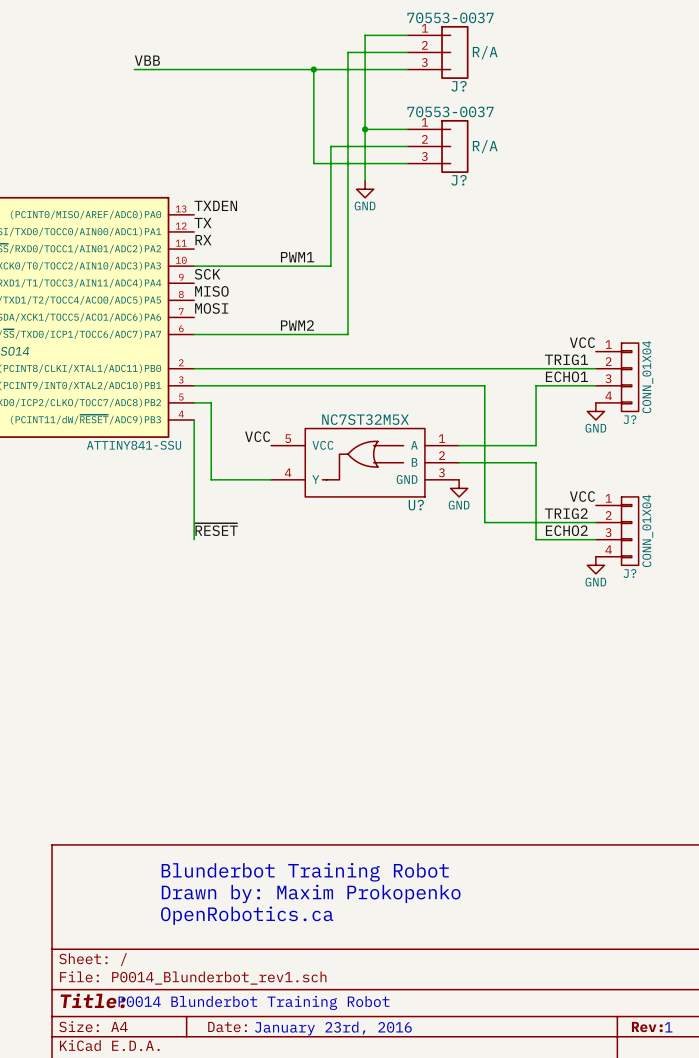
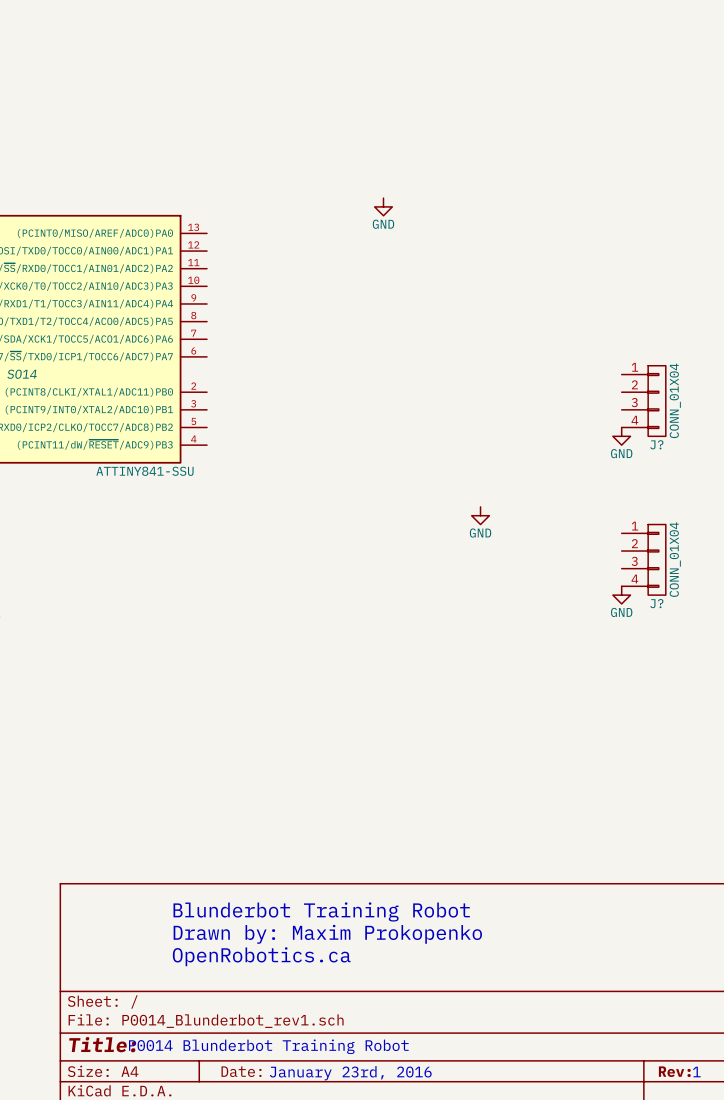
wire: (407, 35) (365, 35) (365, 180) -> none
wire: (407, 52) (348, 52) (348, 334) (194, 334) -> none
J?: 70553-0037 (438, 52) -> none
label: VBB (147, 60) -> none
wire: (134, 69) (407, 69) -> none
wire: (313, 69) (313, 163) (407, 163) -> none
junction: (313, 69) -> none
wire: (365, 129) (407, 129) -> none
junction: (365, 129) -> none
wire: (407, 146) (330, 146) (330, 266) (194, 266) -> none
J?: 70553-0037 (438, 146) -> none
label: TXDEN (215, 205) -> none
label: TX (202, 223) -> none
label: RX (203, 240) -> none
label: PWM1 (297, 257) -> none
label: SCK (207, 274) -> none
label: MISO (211, 291) -> none
label: MOSI (211, 308) -> none
label: PWM2 (297, 325) -> none
label: VCC (582, 342) -> none
label: TRIG1 (566, 359) -> none
wire: (194, 368) (595, 368) -> none
label: ECHO1 (566, 376) -> none
wire: (194, 385) (484, 385) (484, 522) (595, 522) -> none
wire: (595, 385) (536, 385) (536, 445) (459, 445) -> none
wire: (194, 402) (211, 402) (211, 479) (271, 479) -> none
wire: (194, 420) (194, 539) -> none
label: VCC (257, 436) -> none
U?: NC7ST32M5X (365, 462) -> none
wire: (459, 462) (536, 462) (536, 539) (595, 539) -> none
label: VCC (582, 496) -> none
label: TRIG2 (566, 513) -> none
label: ~{RESET} (216, 529) -> none
label: ECHO2 (566, 530) -> none

